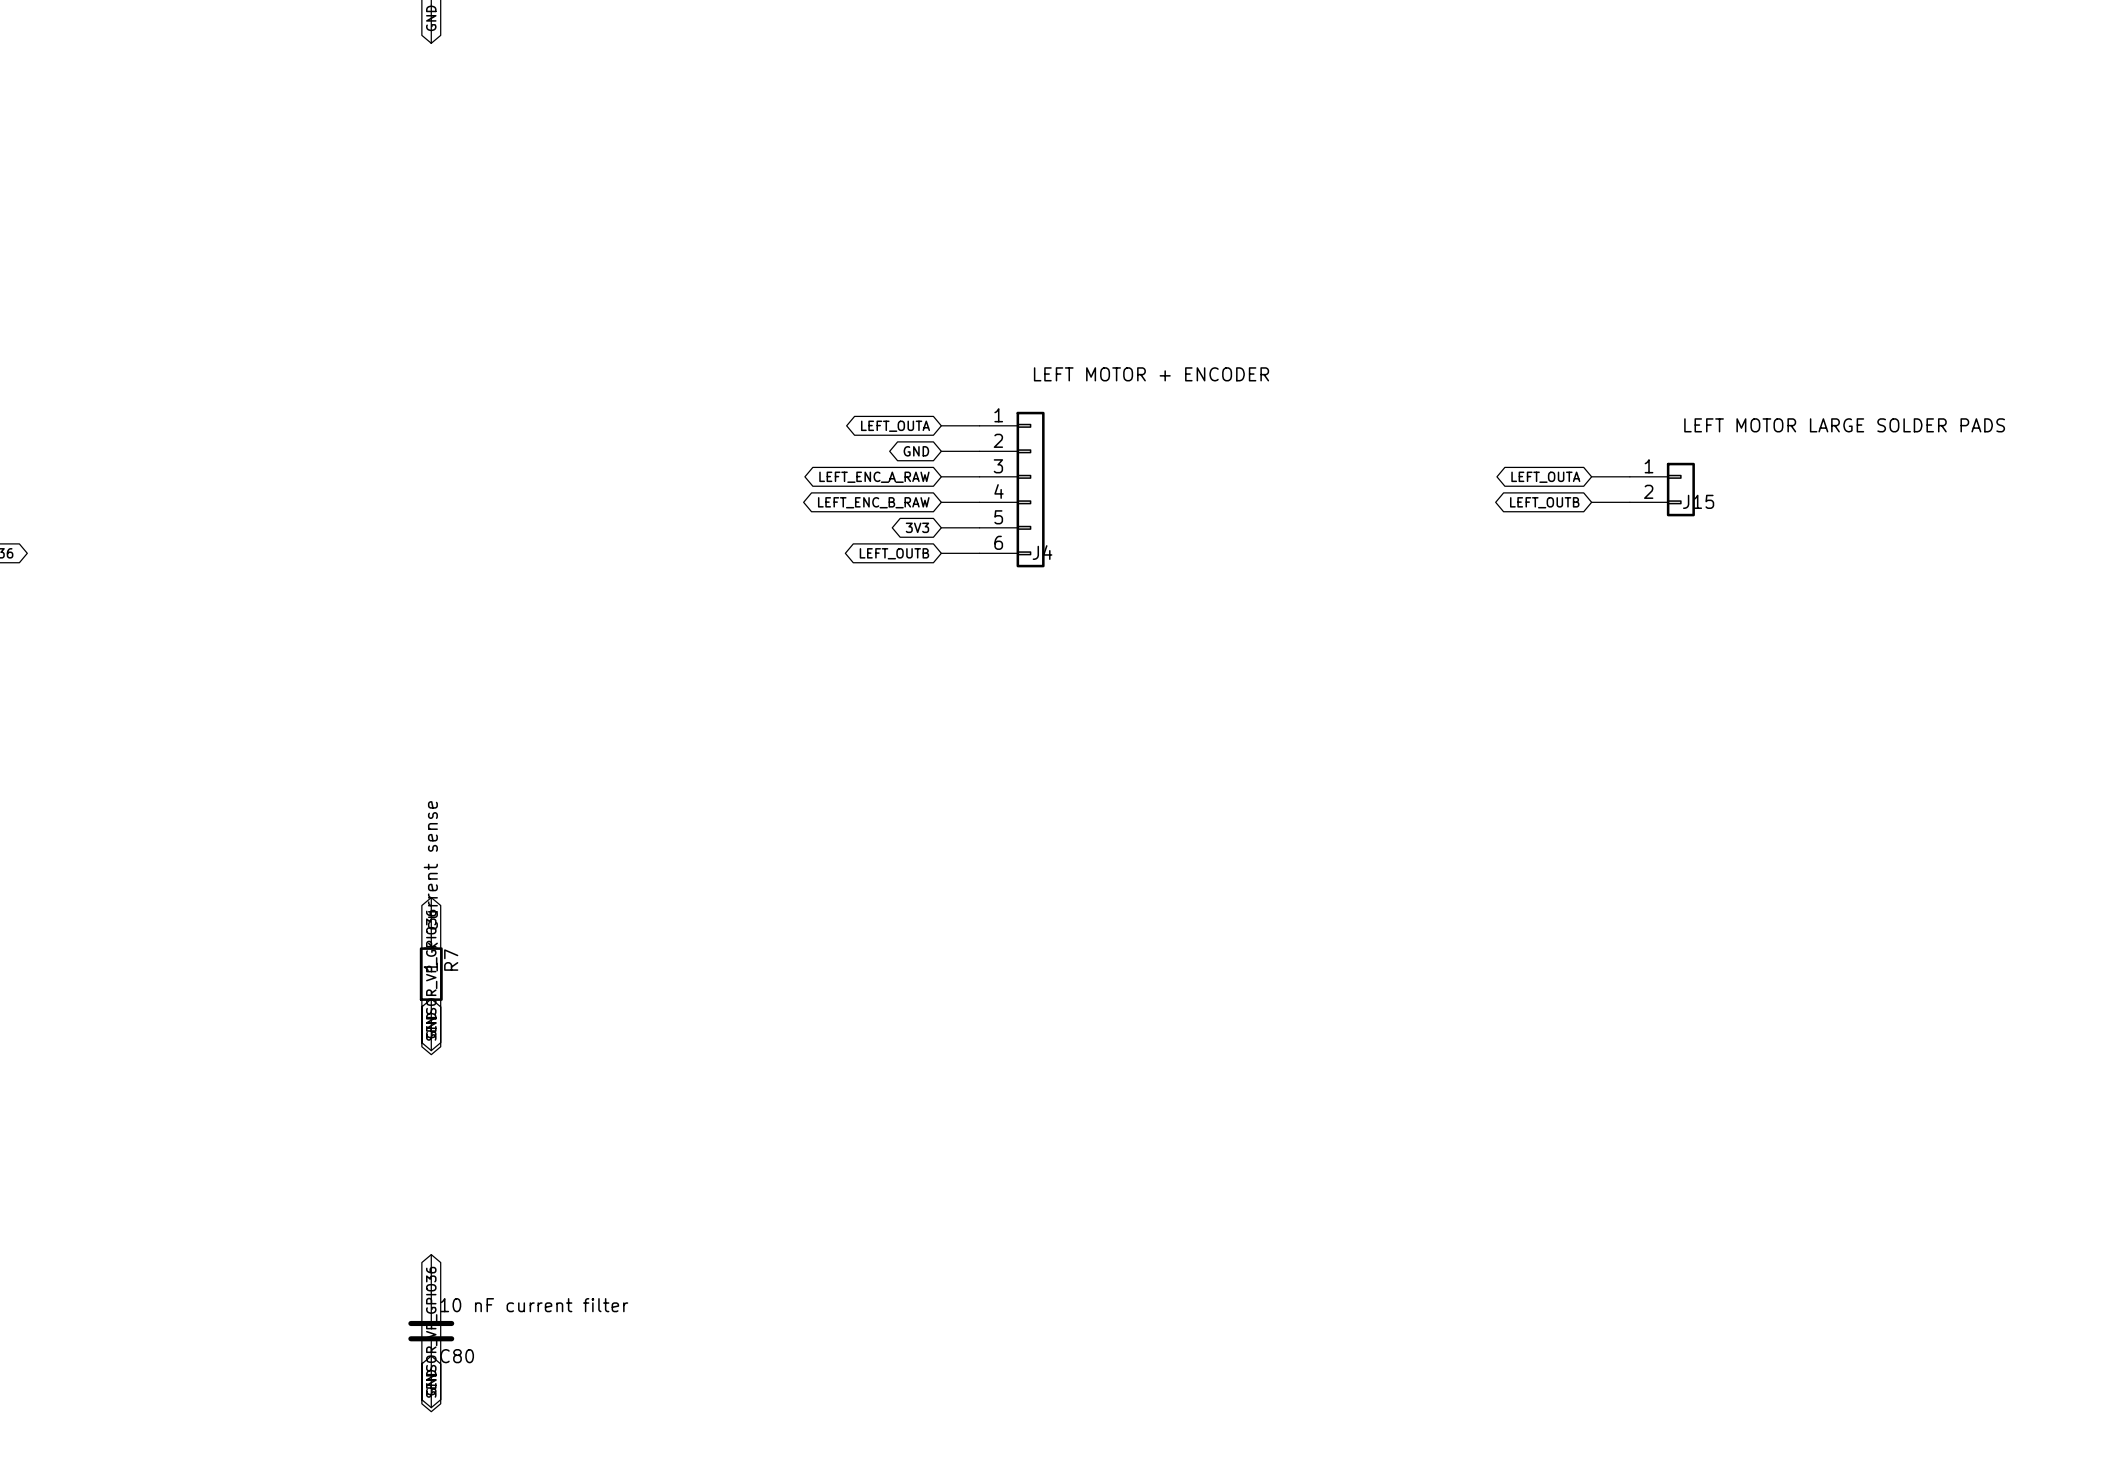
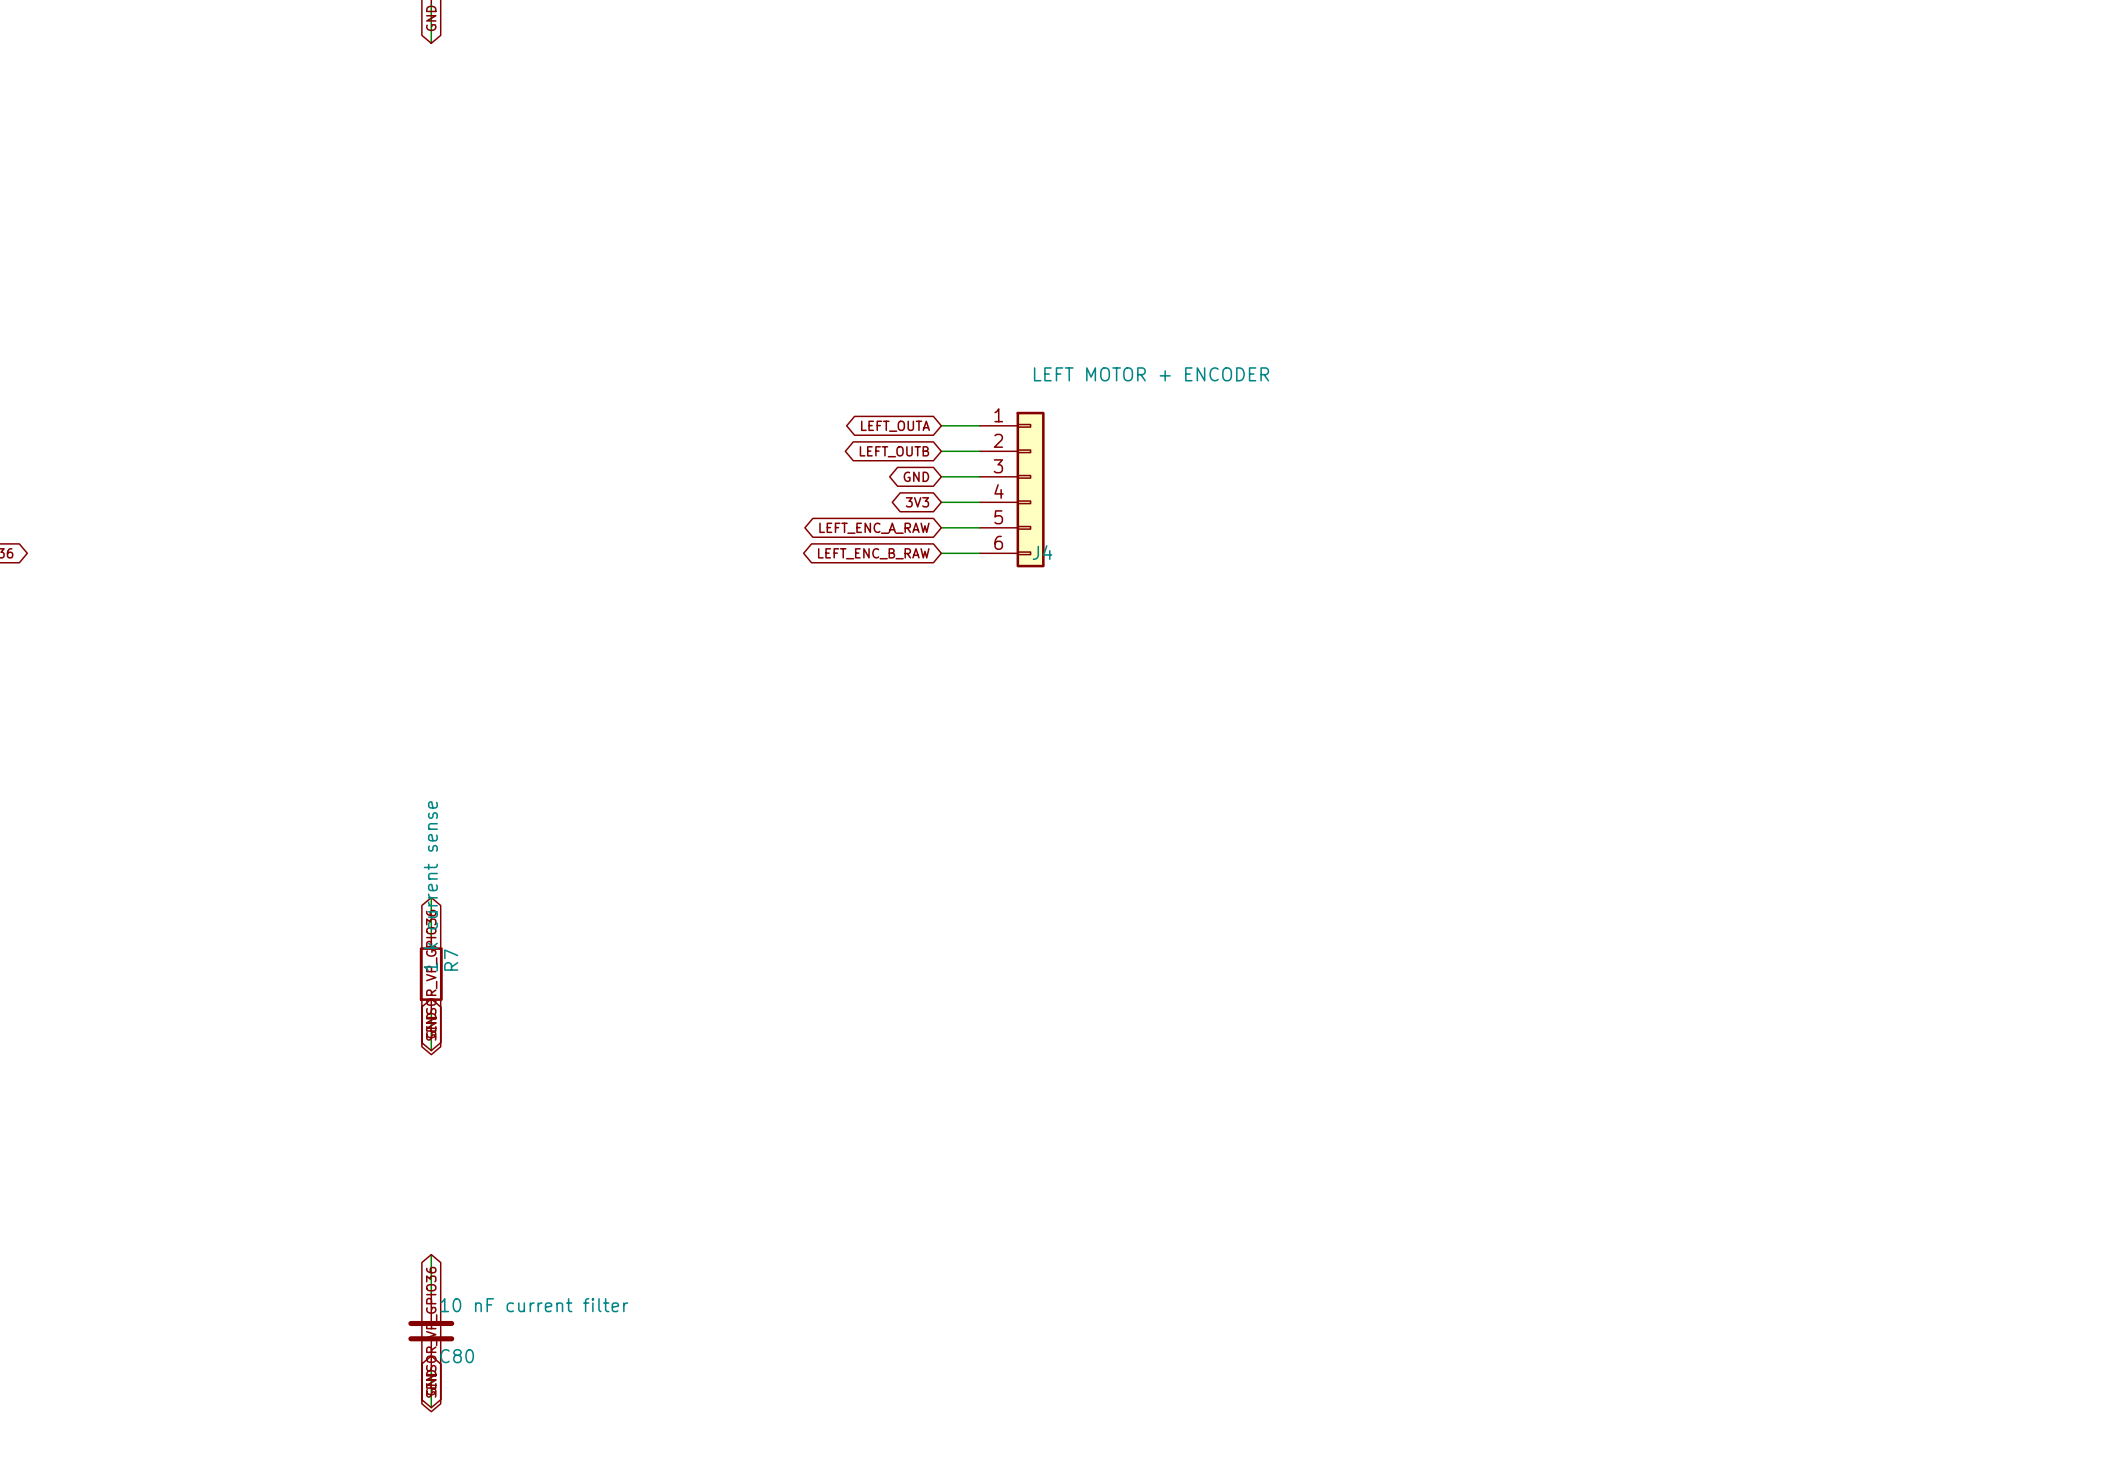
global label: GND (916, 451) -> LEFT_OUTB (894, 451)
wire: (1591, 476) (1629, 476) -> none
global label: LEFT_ENC_A_RAW (874, 477) -> GND (916, 476)
global label: LEFT_OUTA (1545, 477) -> none
J15: LEFT MOTOR LARGE SOLDER PADS (1662, 489) -> none
global label: LEFT_ENC_B_RAW (873, 502) -> 3V3 (917, 502)
global label: LEFT_OUTB (1544, 502) -> none
wire: (1591, 502) (1629, 502) -> none
global label: 3V3 (917, 527) -> LEFT_ENC_A_RAW (874, 528)
global label: LEFT_OUTB (894, 553) -> LEFT_ENC_B_RAW (873, 553)

